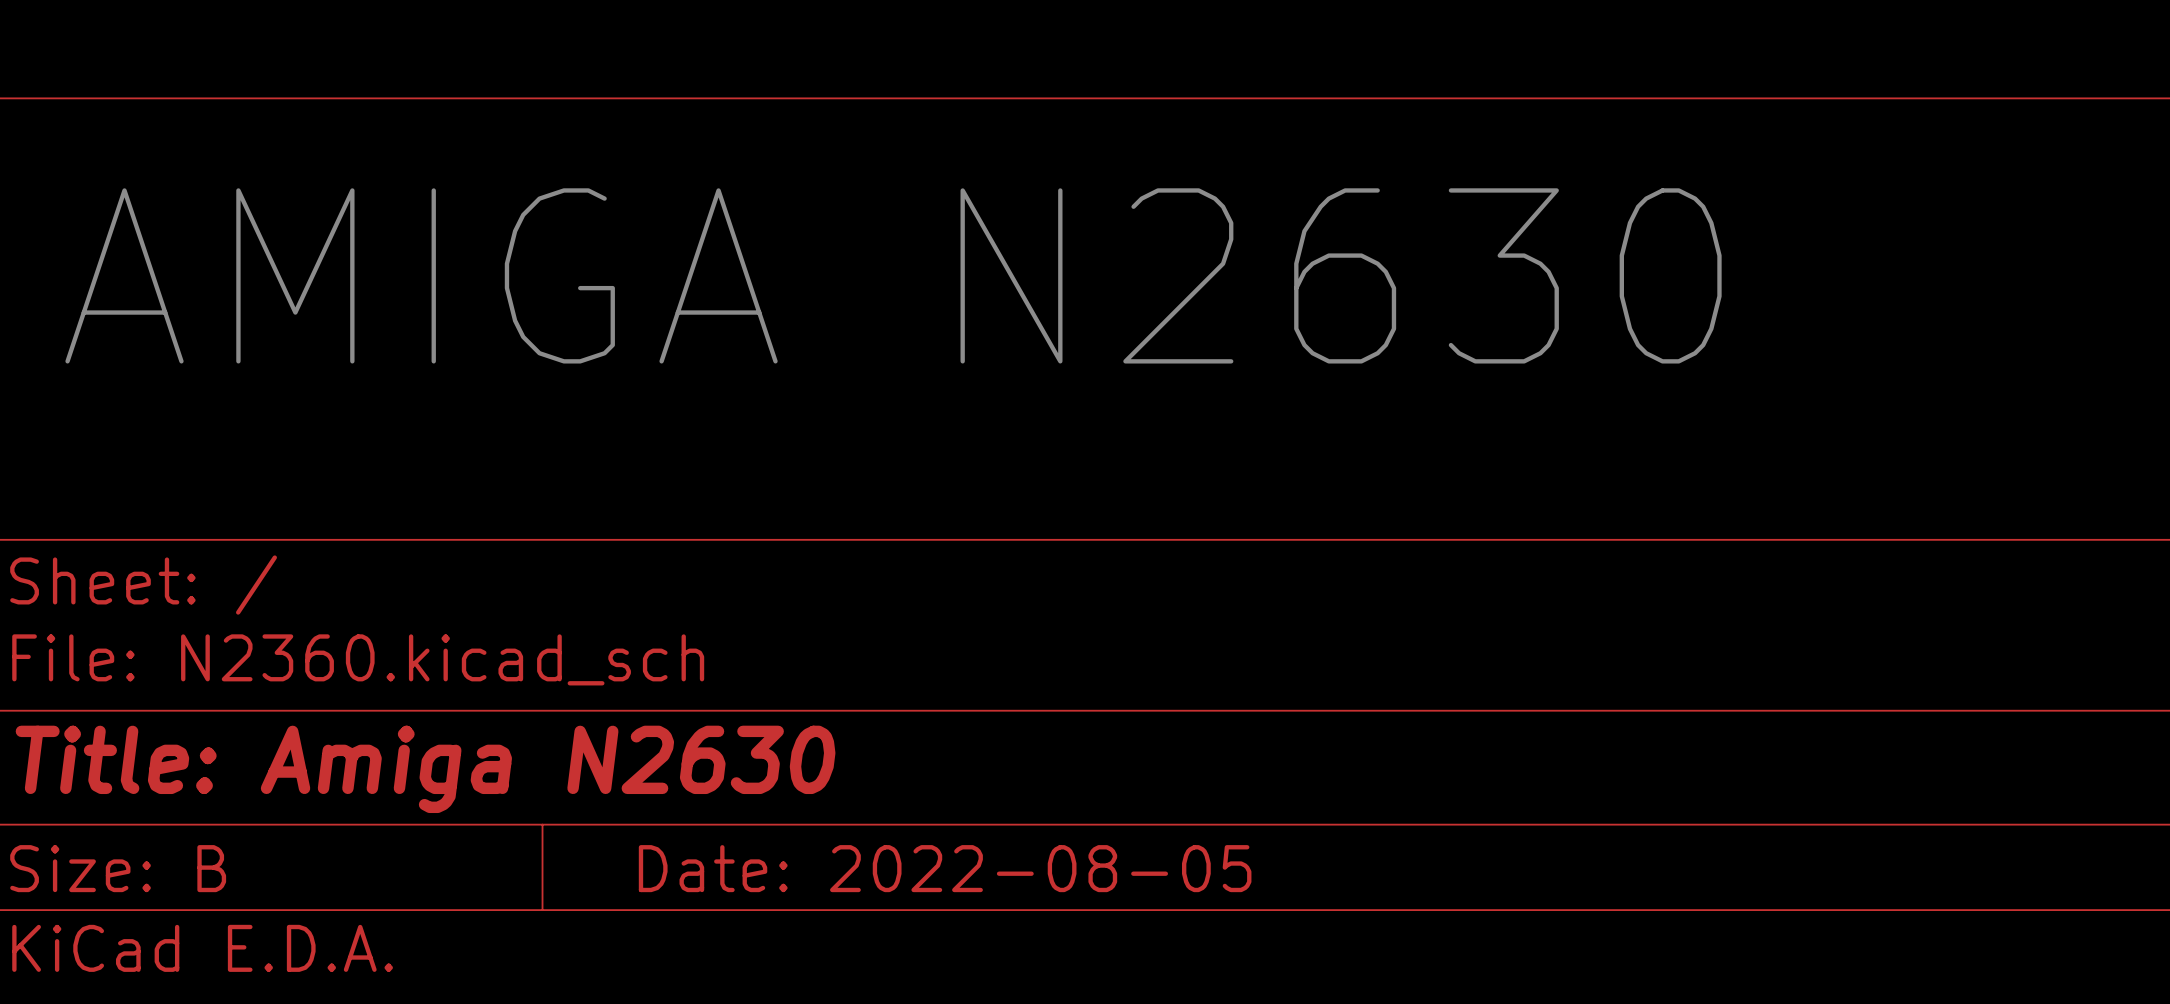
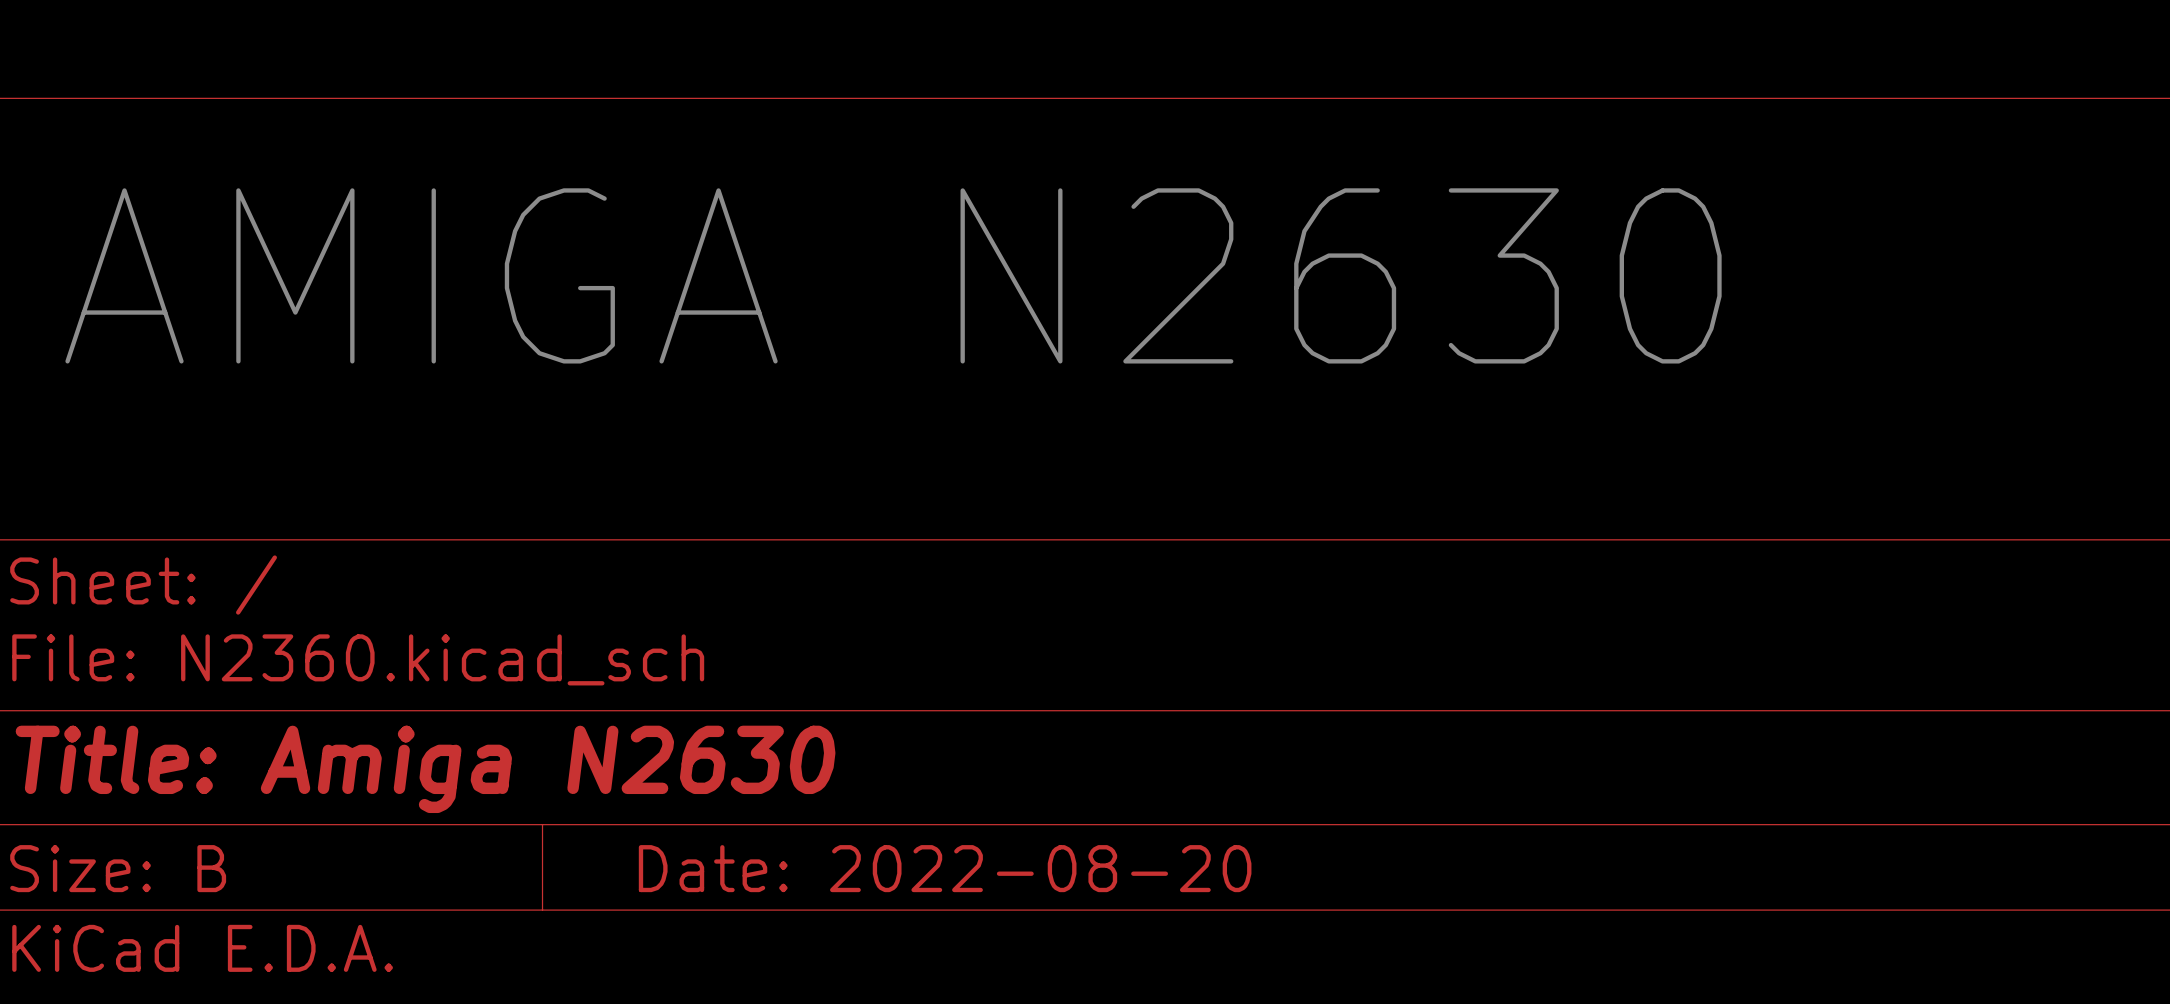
title block: Date: 2022-08-05 (945, 868) -> Date: 2022-08-20 (945, 868)

